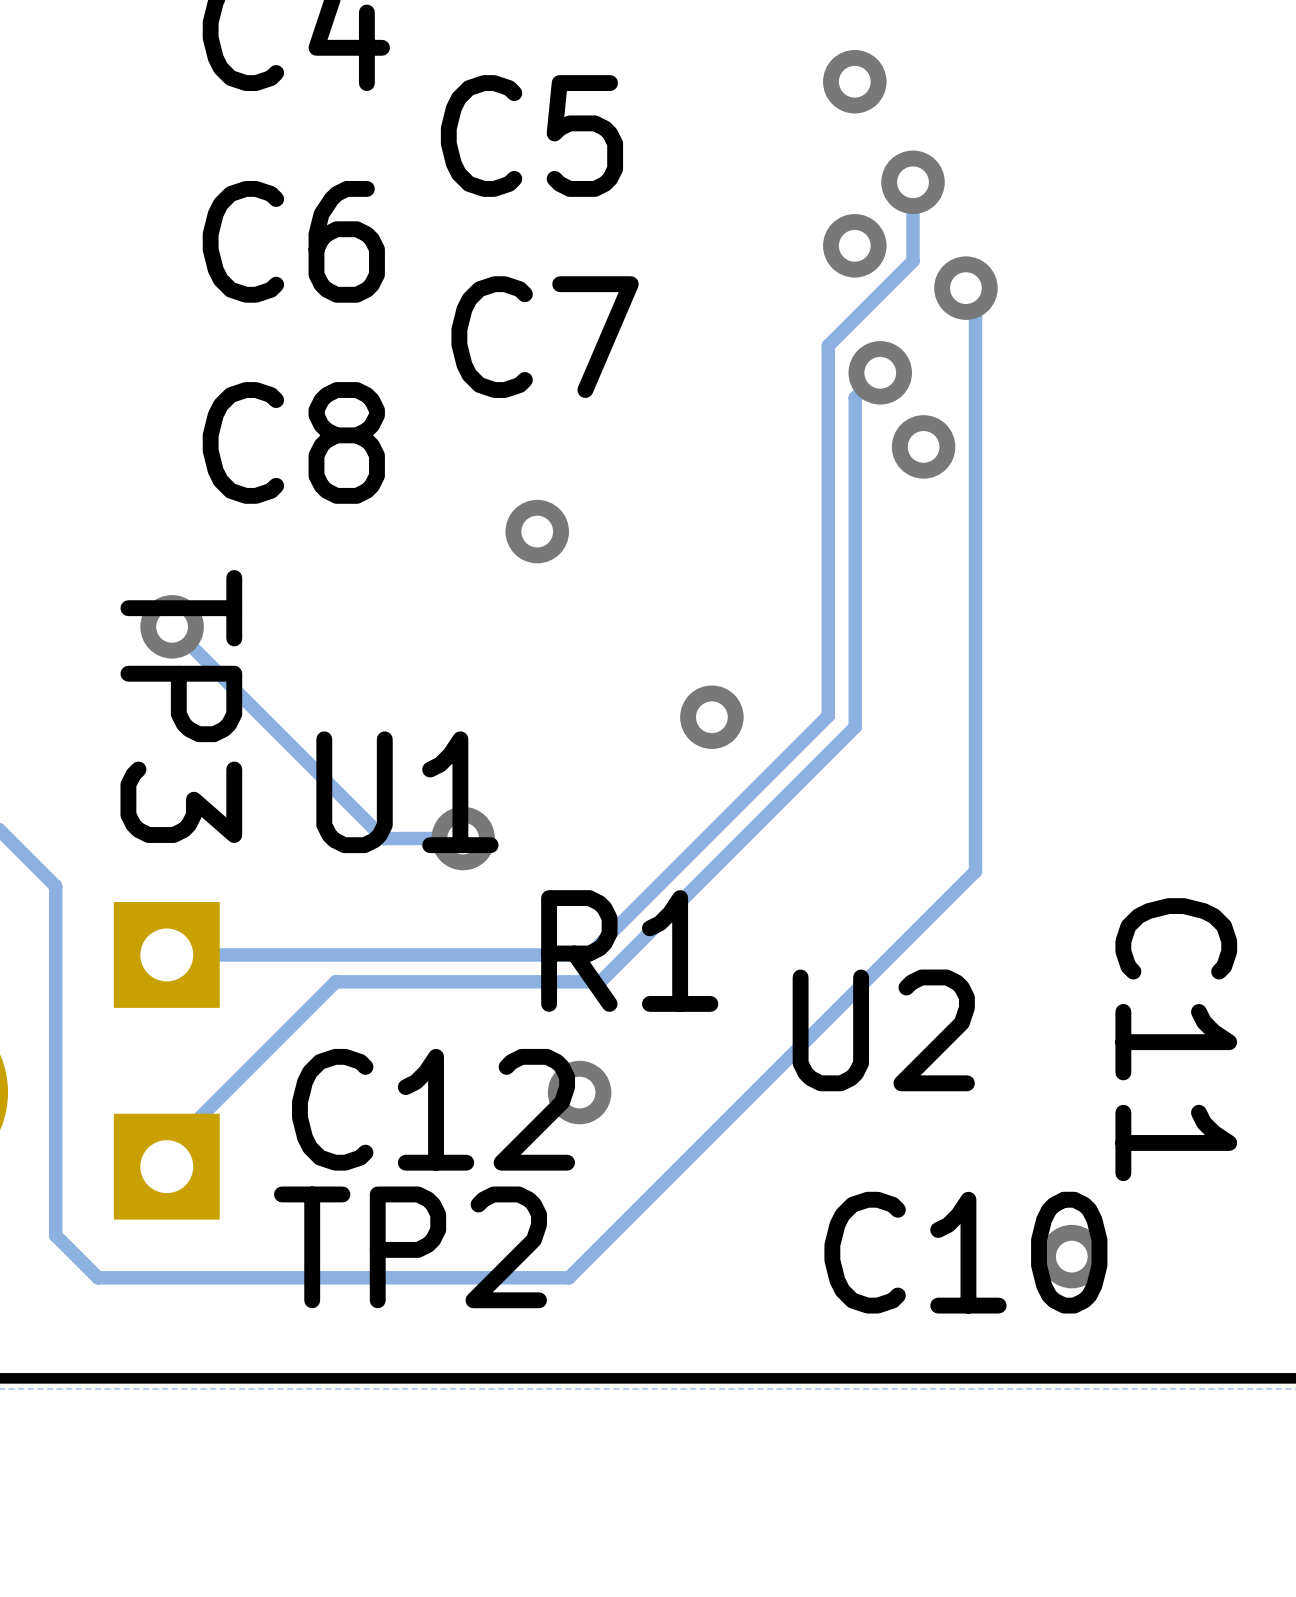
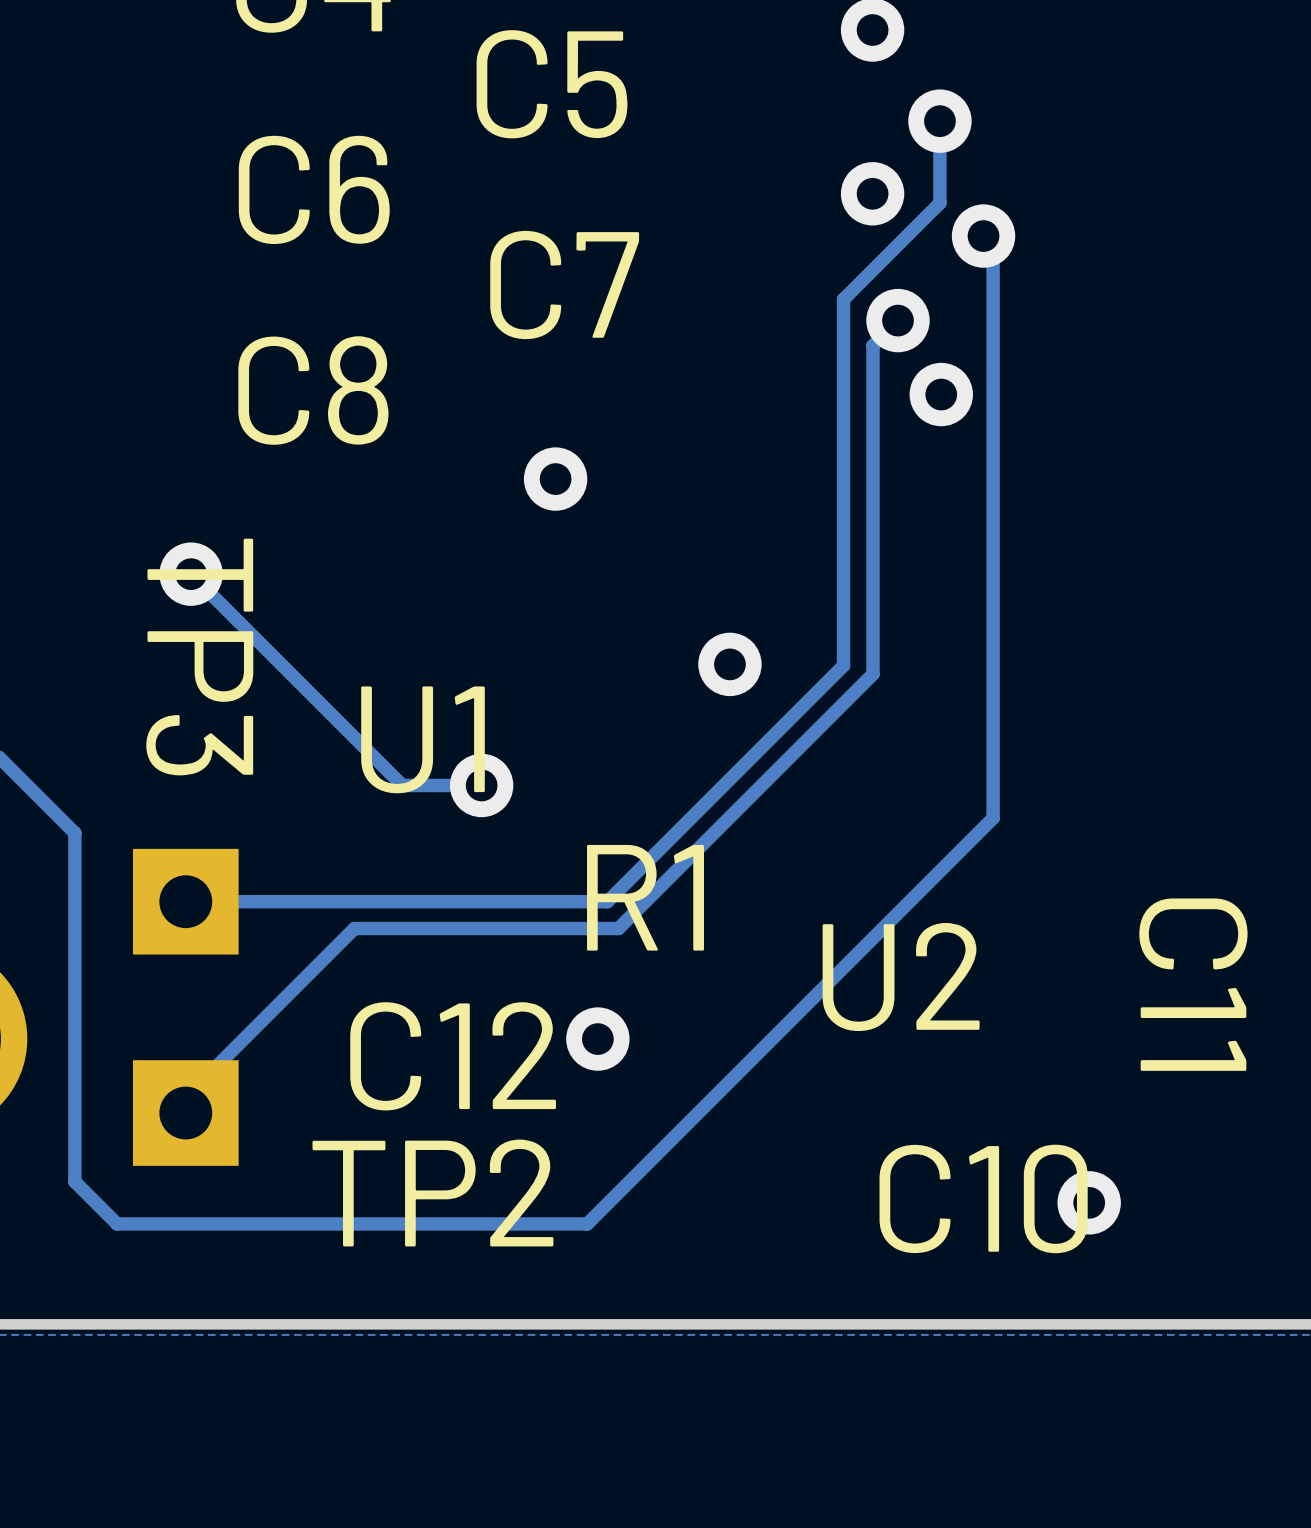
track: (913, 182) (913, 261) (828, 345) (828, 715) (825, 718) -> (939, 121) (939, 203) (843, 299) (843, 665)
via position: (913, 182) -> (939, 121)

